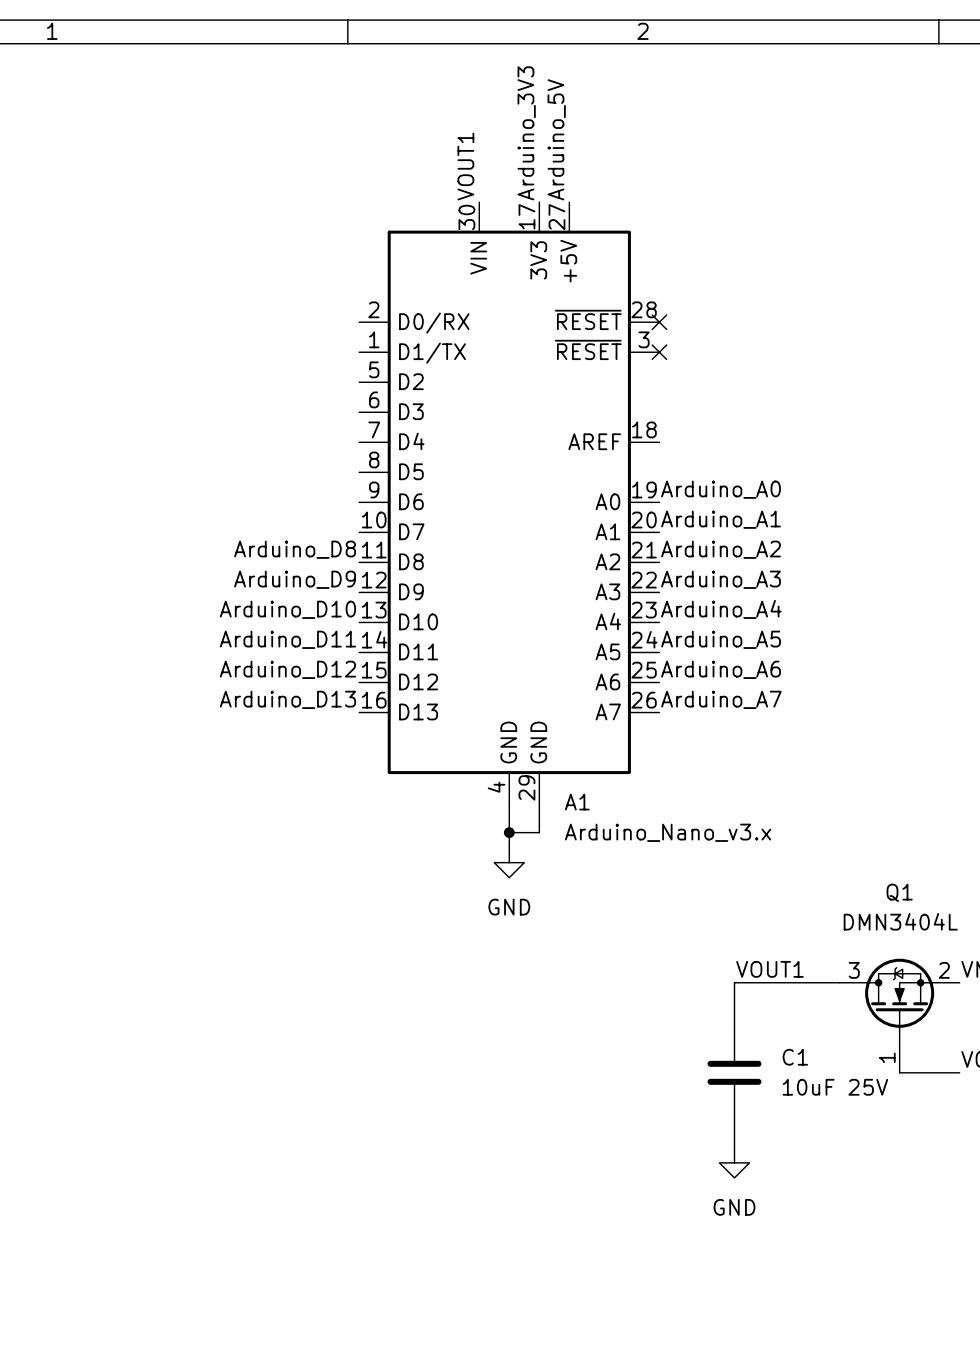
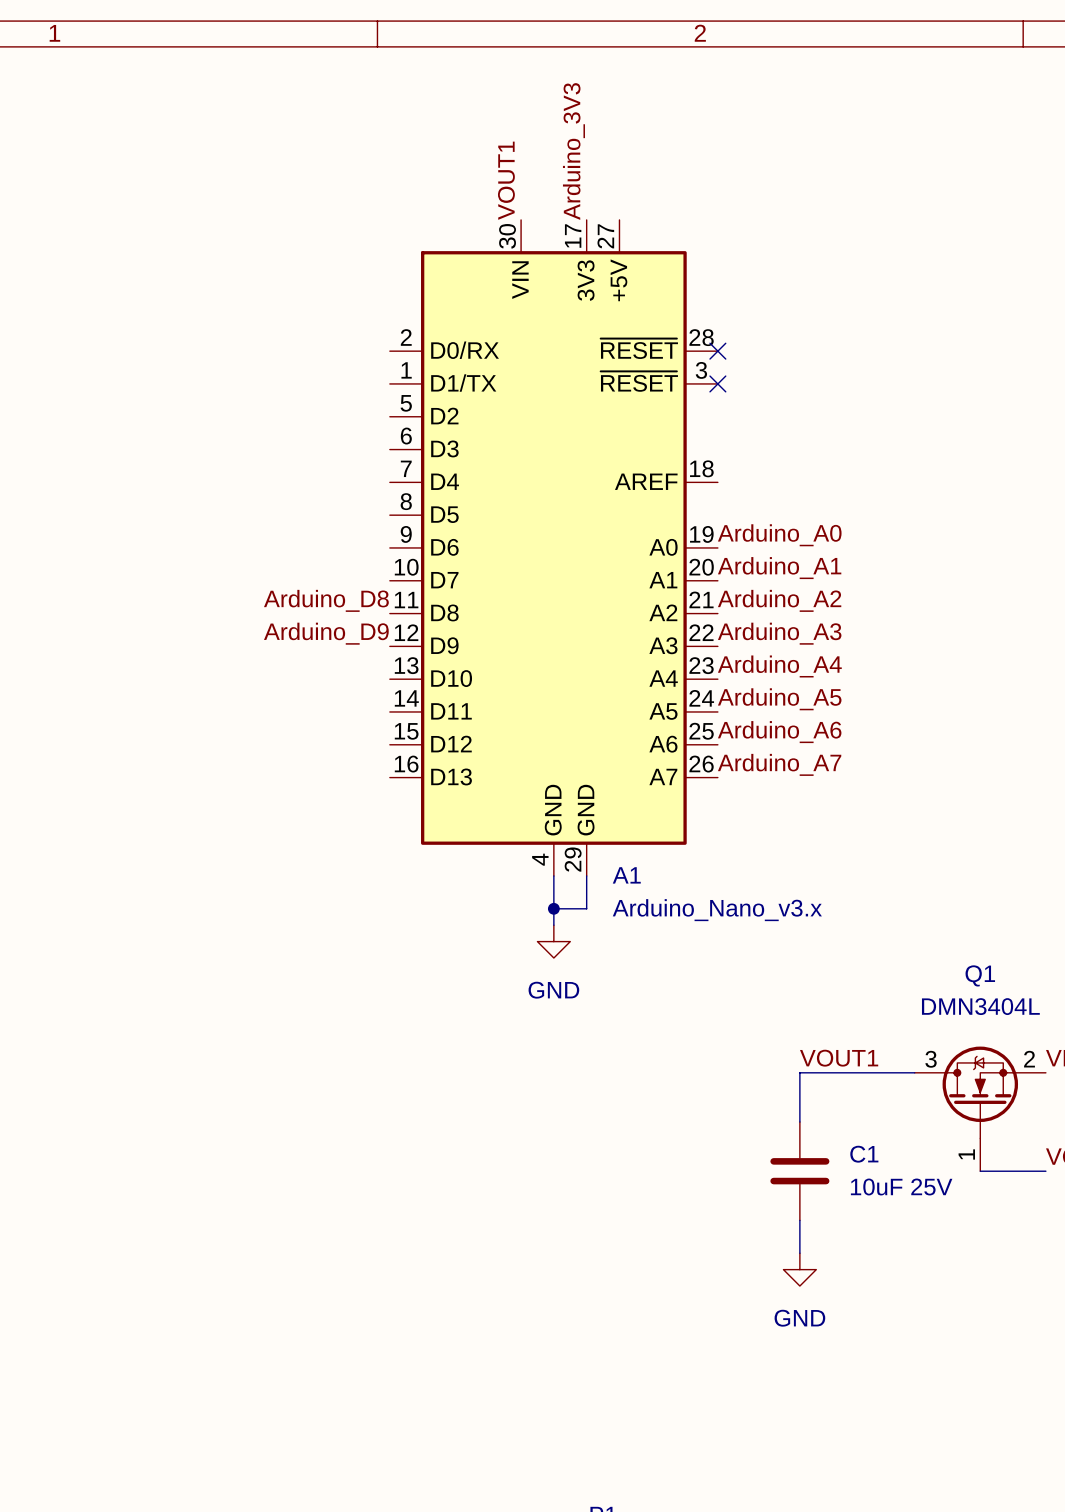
label: Arduino_5V (556, 139) -> none
label: Arduino_D10 (287, 609) -> none
label: Arduino_D11 (287, 639) -> none
label: Arduino_D12 (287, 669) -> none
label: Arduino_D13 (287, 699) -> none

